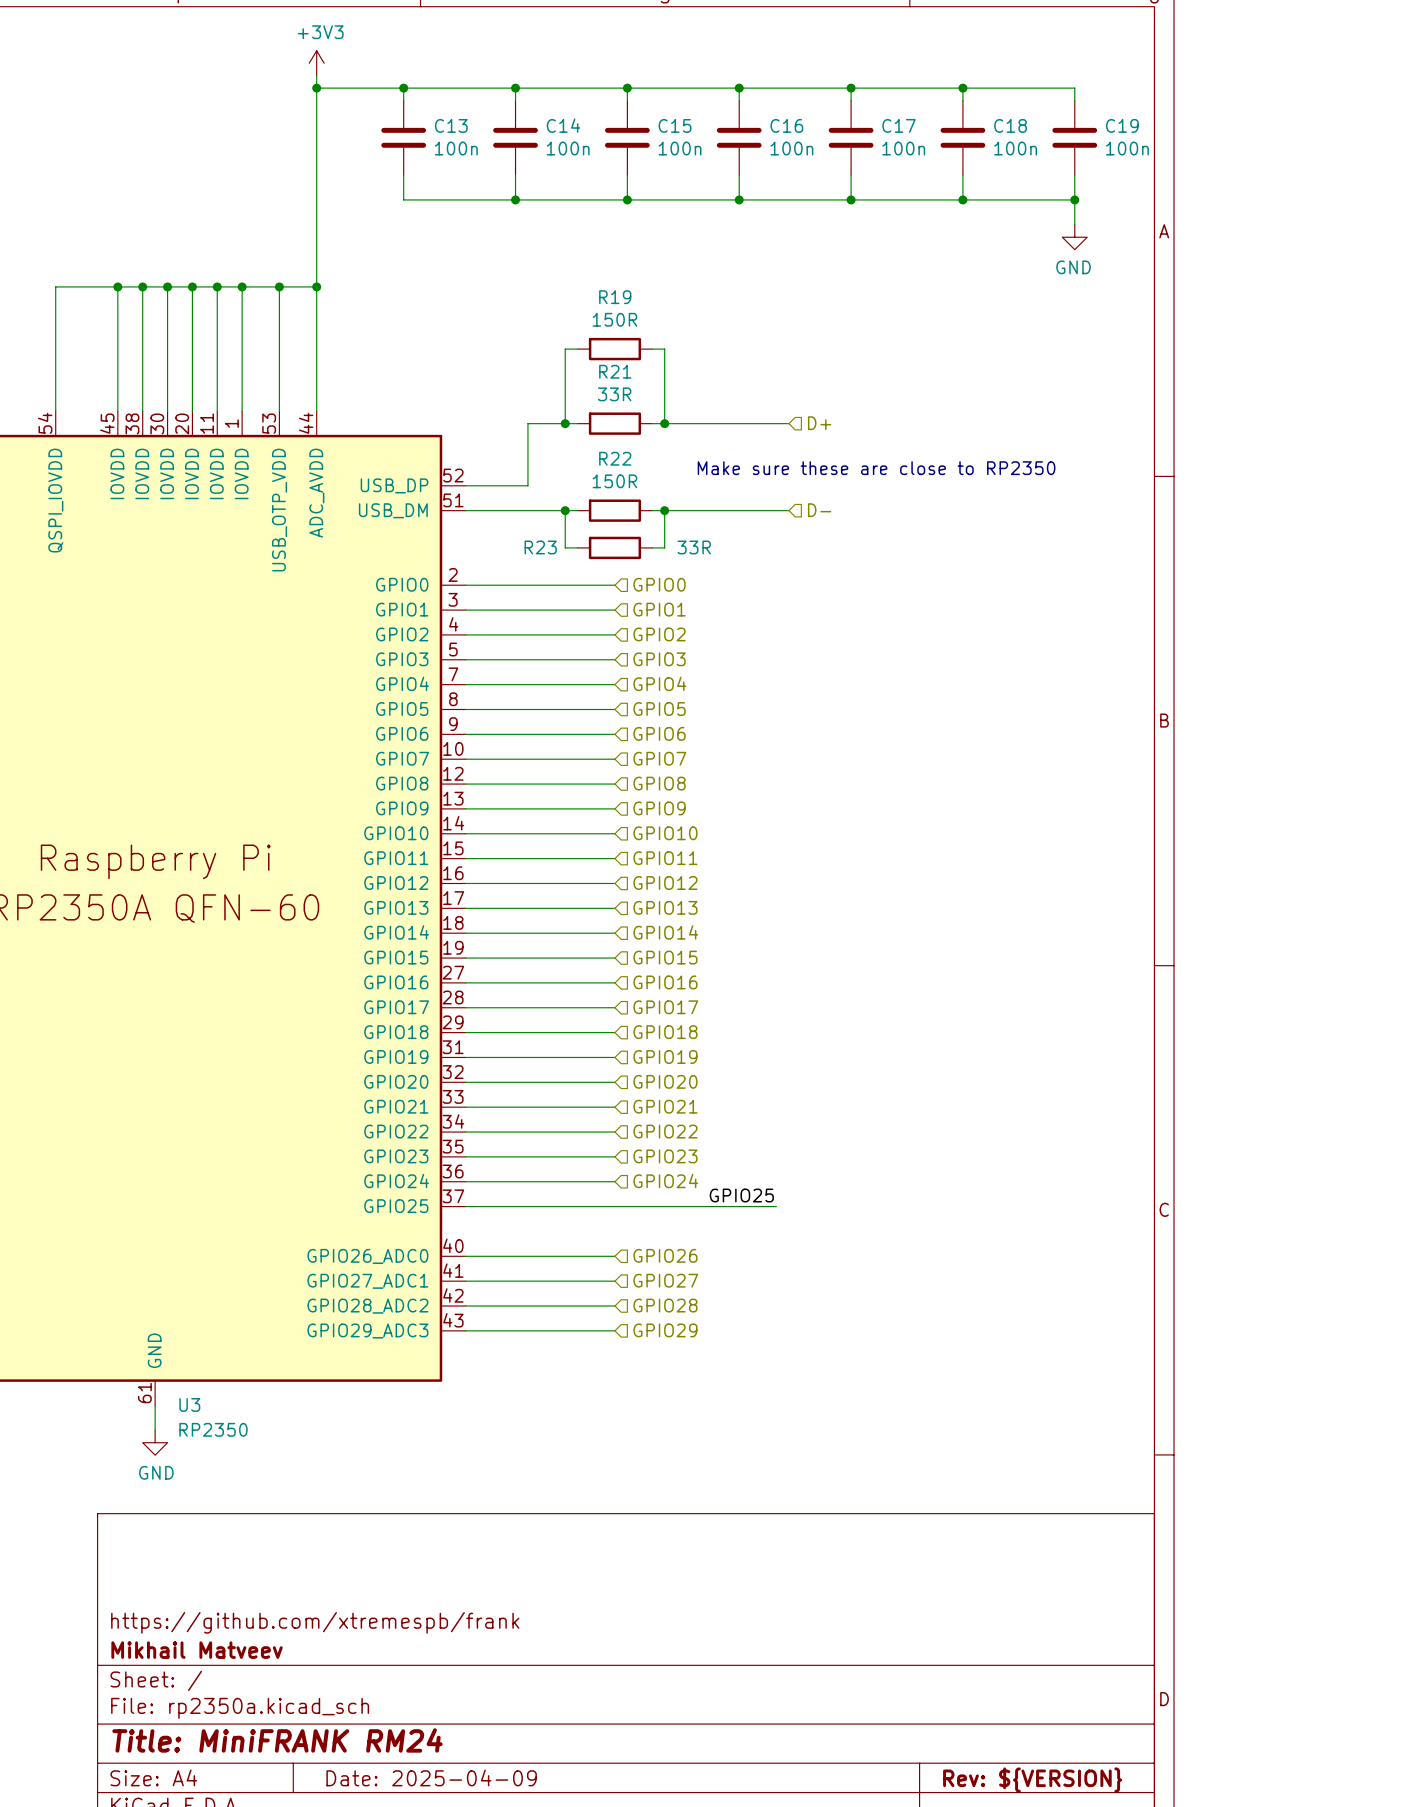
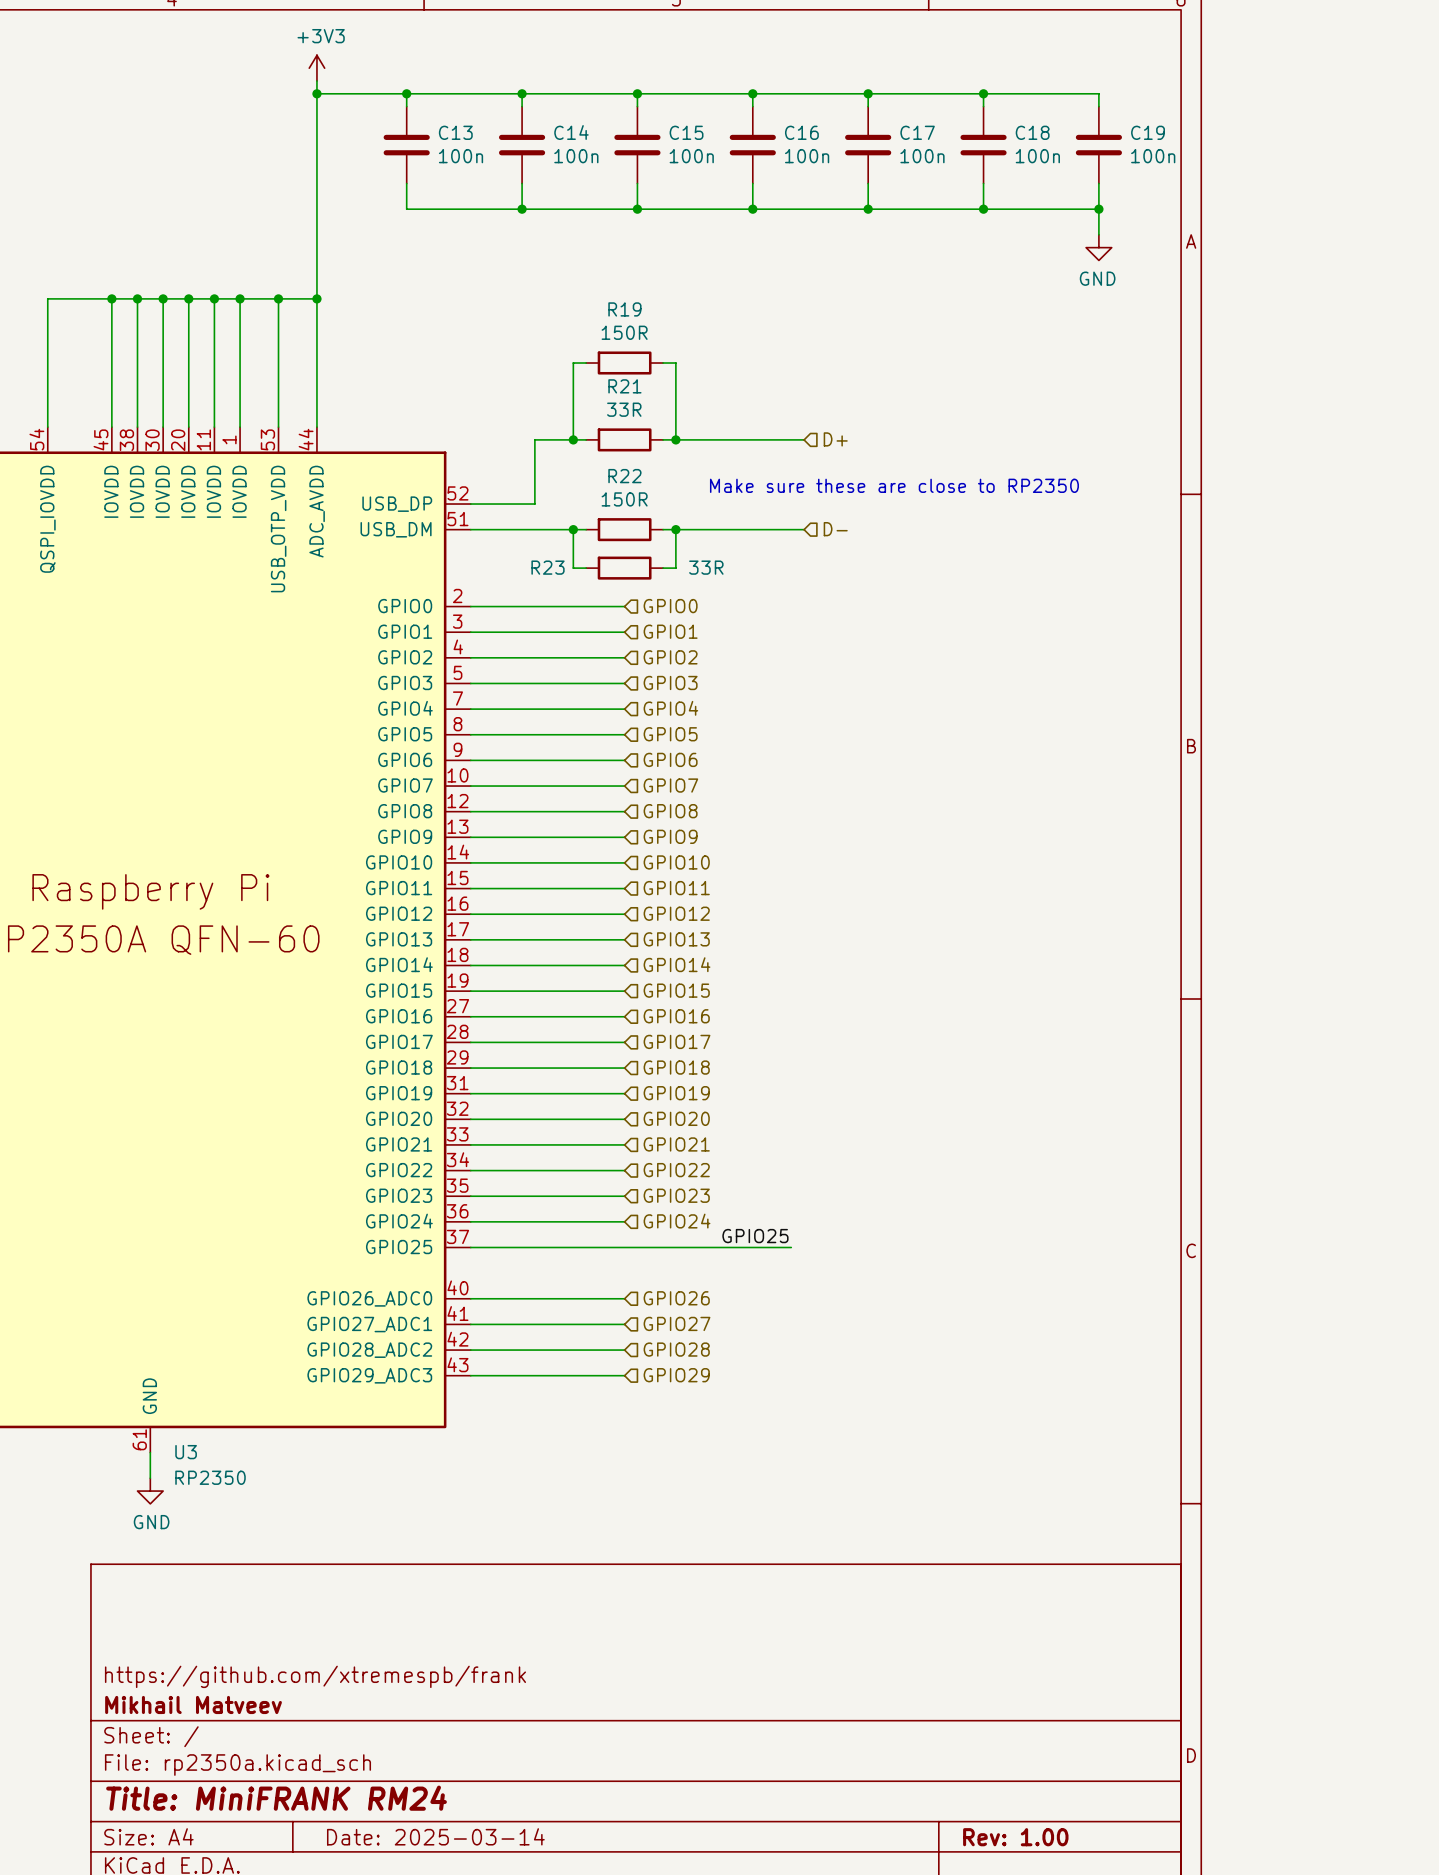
title block: Date: 2025-04-09 (431, 1777) -> Date: 2025-03-14 (435, 1836)
title block: Rev: ${VERSION} (1032, 1780) -> Rev: 1.00 (1015, 1837)

